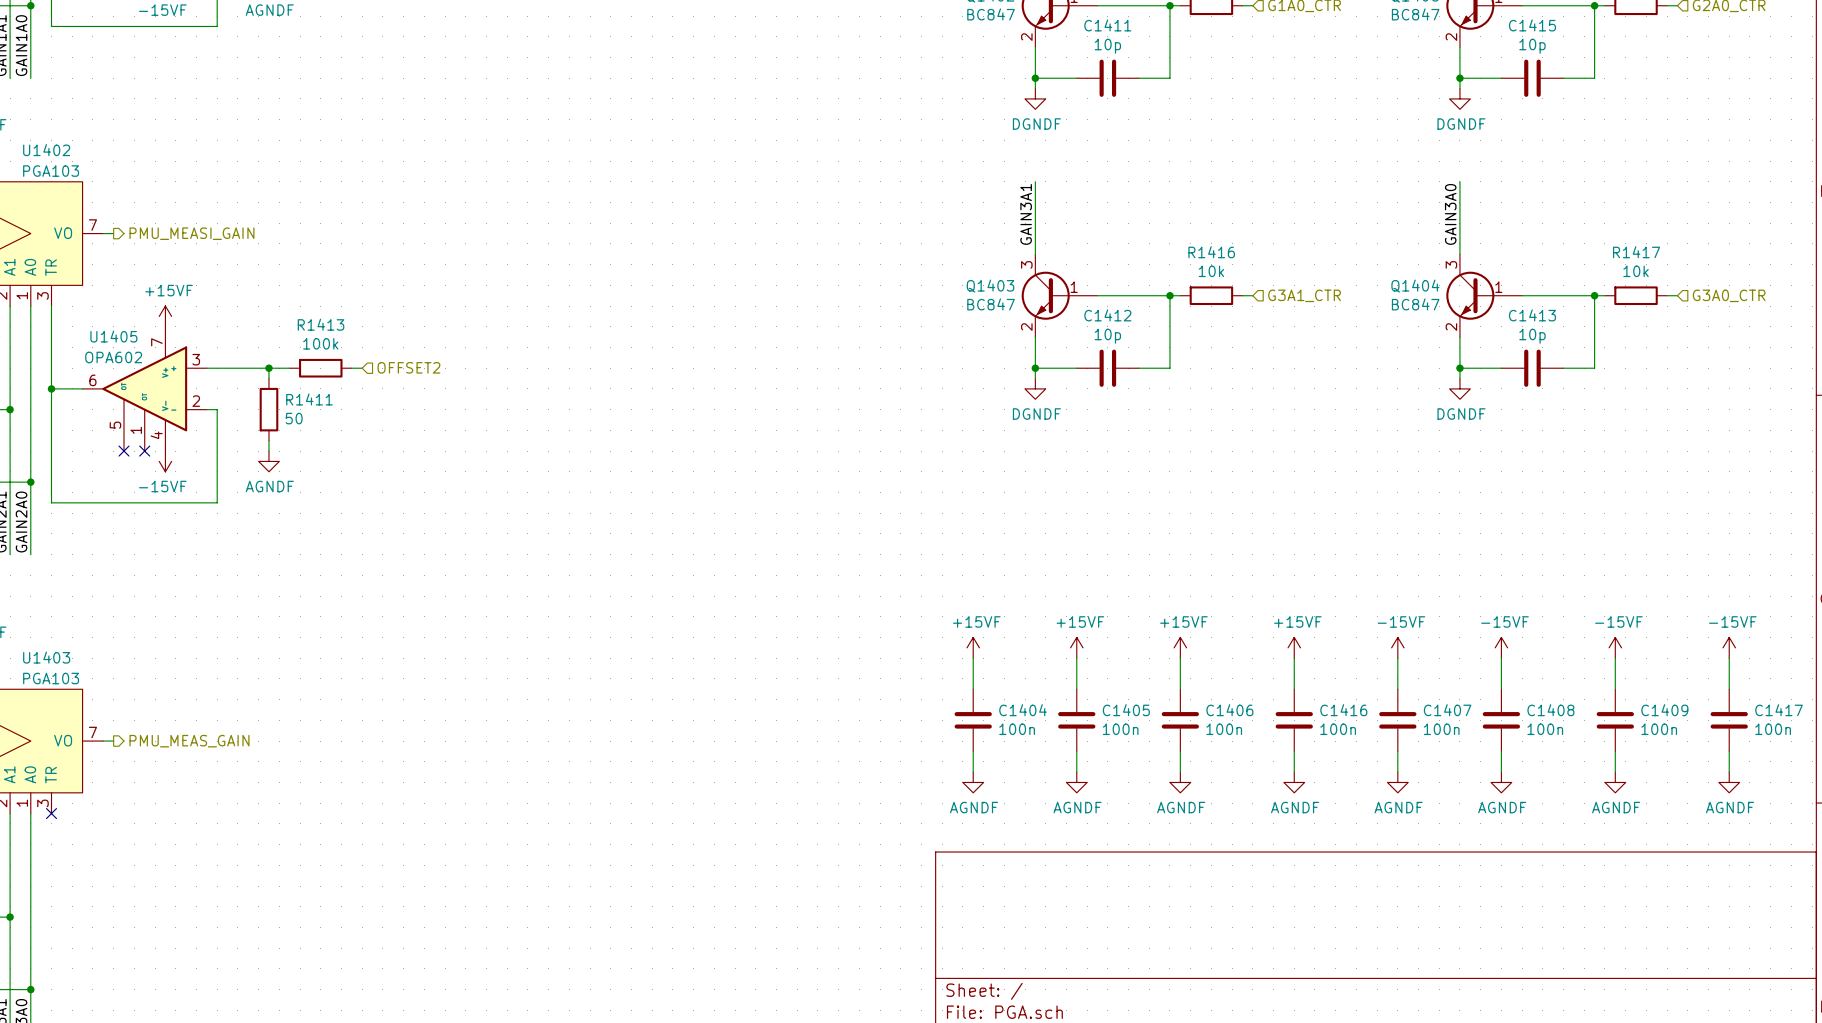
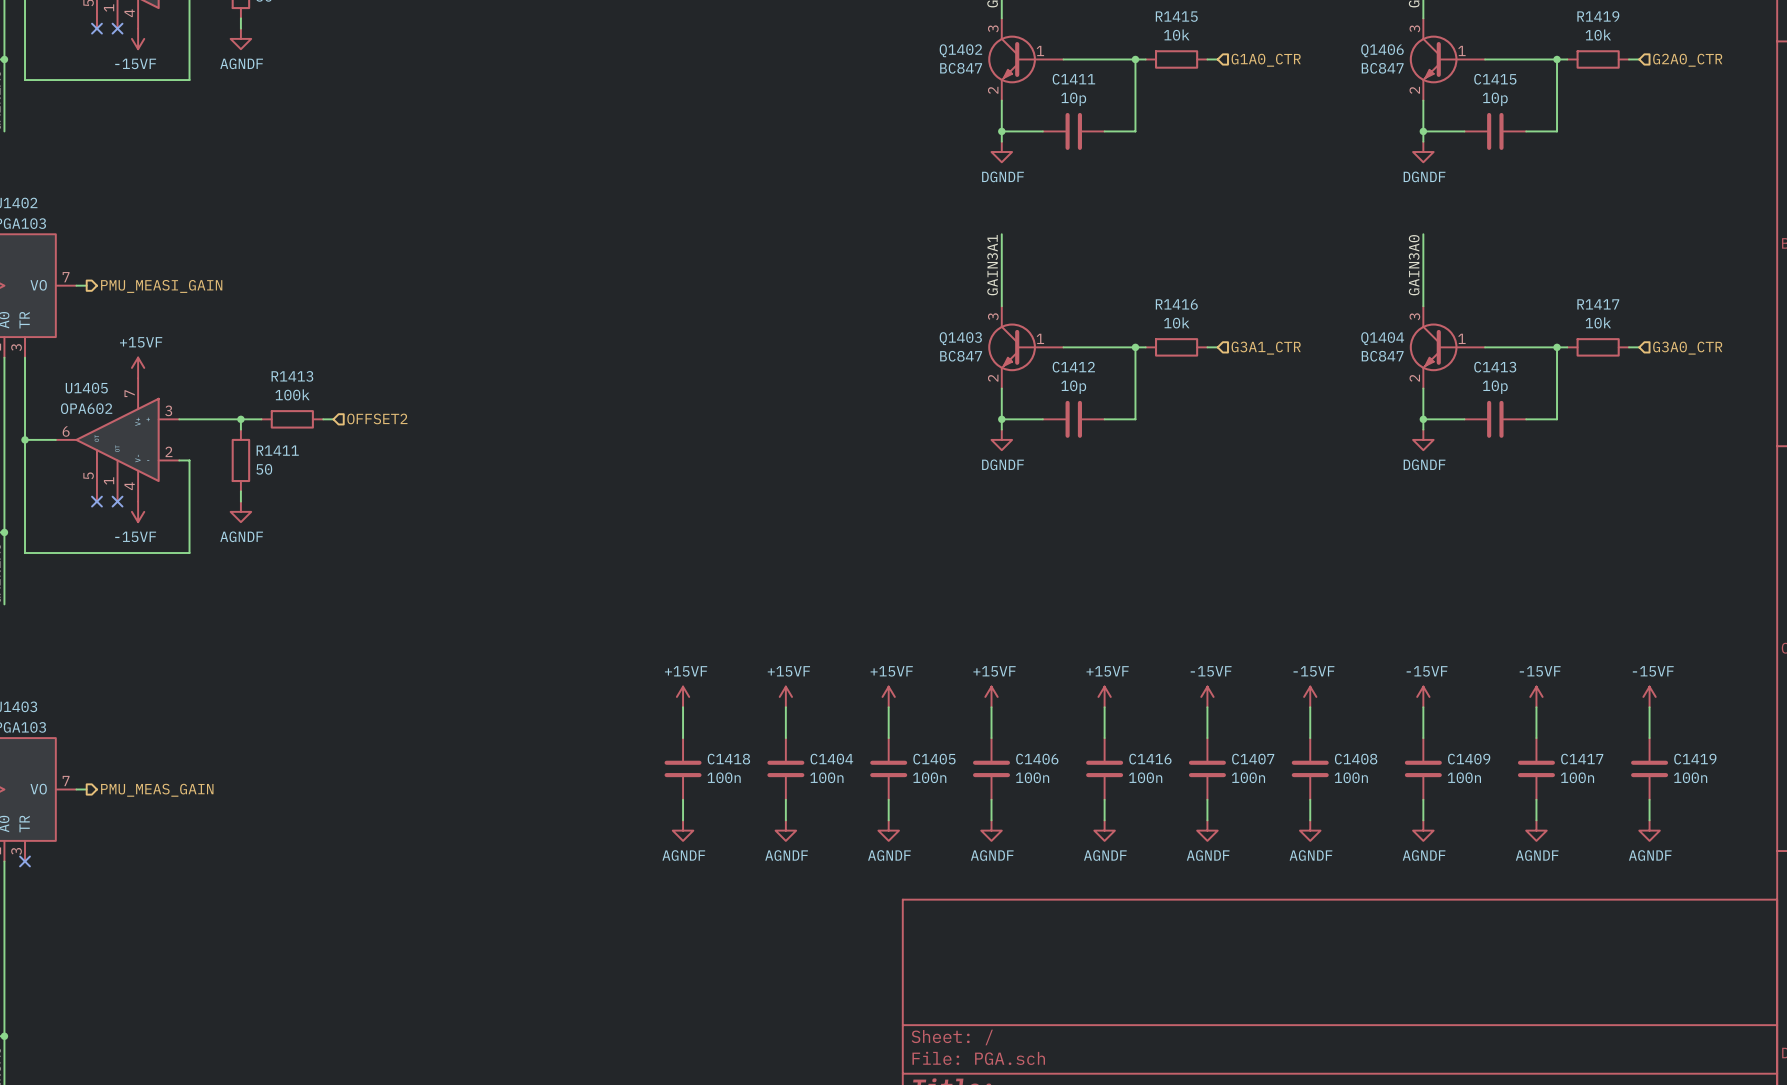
power symbol: none -> +15VF (683, 696)
power symbol: none -> +15VF (785, 696)
power symbol: none -> +15VF (888, 696)
power symbol: +15VF (973, 647) -> none
power symbol: none -> +15VF (991, 696)
power symbol: +15VF (1076, 647) -> none
power symbol: none -> +15VF (1104, 696)
power symbol: +15VF (1180, 647) -> none
power symbol: none -> -15VF (1207, 696)
power symbol: +15VF (1294, 647) -> none
power symbol: none -> -15VF (1310, 696)
power symbol: -15VF (1397, 647) -> none
power symbol: none -> -15VF (1423, 696)
power symbol: -15VF (1501, 647) -> none
power symbol: none -> -15VF (1536, 696)
power symbol: -15VF (1615, 647) -> none
power symbol: none -> -15VF (1649, 696)
power symbol: -15VF (1729, 647) -> none
wire: none -> (683, 707) (683, 738)
wire: (973, 658) (973, 689) -> (785, 707) (785, 738)
wire: (1076, 658) (1076, 689) -> (888, 707) (888, 738)
wire: (1180, 658) (1180, 689) -> (991, 707) (991, 738)
wire: (1294, 658) (1294, 689) -> (1104, 707) (1104, 738)
wire: (1397, 658) (1397, 689) -> (1207, 707) (1207, 738)
wire: (1501, 658) (1501, 689) -> (1310, 707) (1310, 738)
wire: (1615, 658) (1615, 689) -> (1423, 707) (1423, 738)
wire: none -> (1649, 707) (1649, 738)
wire: (1729, 658) (1729, 689) -> (1536, 707) (1536, 738)
C1418: none -> 100n (683, 768)
C1404 position: (973, 720) -> (785, 768)
C1405 position: (1076, 720) -> (888, 768)
C1406 position: (1180, 720) -> (991, 768)
C1416 position: (1294, 720) -> (1104, 768)
C1407 position: (1397, 720) -> (1207, 768)
C1408 position: (1501, 720) -> (1310, 768)
C1409 position: (1615, 720) -> (1423, 768)
C1419: none -> 100n (1649, 768)
C1417 position: (1729, 720) -> (1536, 768)
wire: none -> (683, 799) (683, 820)
wire: (973, 751) (973, 772) -> (785, 799) (785, 820)
wire: (1076, 751) (1076, 772) -> (888, 799) (888, 820)
wire: (1180, 751) (1180, 772) -> (991, 799) (991, 820)
wire: (1294, 751) (1294, 772) -> (1104, 799) (1104, 820)
wire: (1397, 751) (1397, 772) -> (1207, 799) (1207, 820)
wire: (1501, 751) (1501, 772) -> (1310, 799) (1310, 820)
wire: (1615, 751) (1615, 772) -> (1423, 799) (1423, 820)
wire: none -> (1649, 799) (1649, 820)
wire: (1729, 751) (1729, 772) -> (1536, 799) (1536, 820)
power symbol: none -> AGNDF (683, 830)
power symbol: none -> AGNDF (785, 830)
power symbol: none -> AGNDF (888, 830)
power symbol: AGNDF (973, 782) -> none
power symbol: none -> AGNDF (991, 830)
power symbol: AGNDF (1076, 782) -> none
power symbol: none -> AGNDF (1104, 830)
power symbol: AGNDF (1180, 782) -> none
power symbol: none -> AGNDF (1207, 830)
power symbol: AGNDF (1294, 782) -> none
power symbol: none -> AGNDF (1310, 830)
power symbol: AGNDF (1397, 782) -> none
power symbol: none -> AGNDF (1423, 830)
power symbol: AGNDF (1501, 782) -> none
power symbol: none -> AGNDF (1536, 830)
power symbol: AGNDF (1615, 782) -> none
power symbol: none -> AGNDF (1649, 830)
power symbol: AGNDF (1729, 782) -> none

